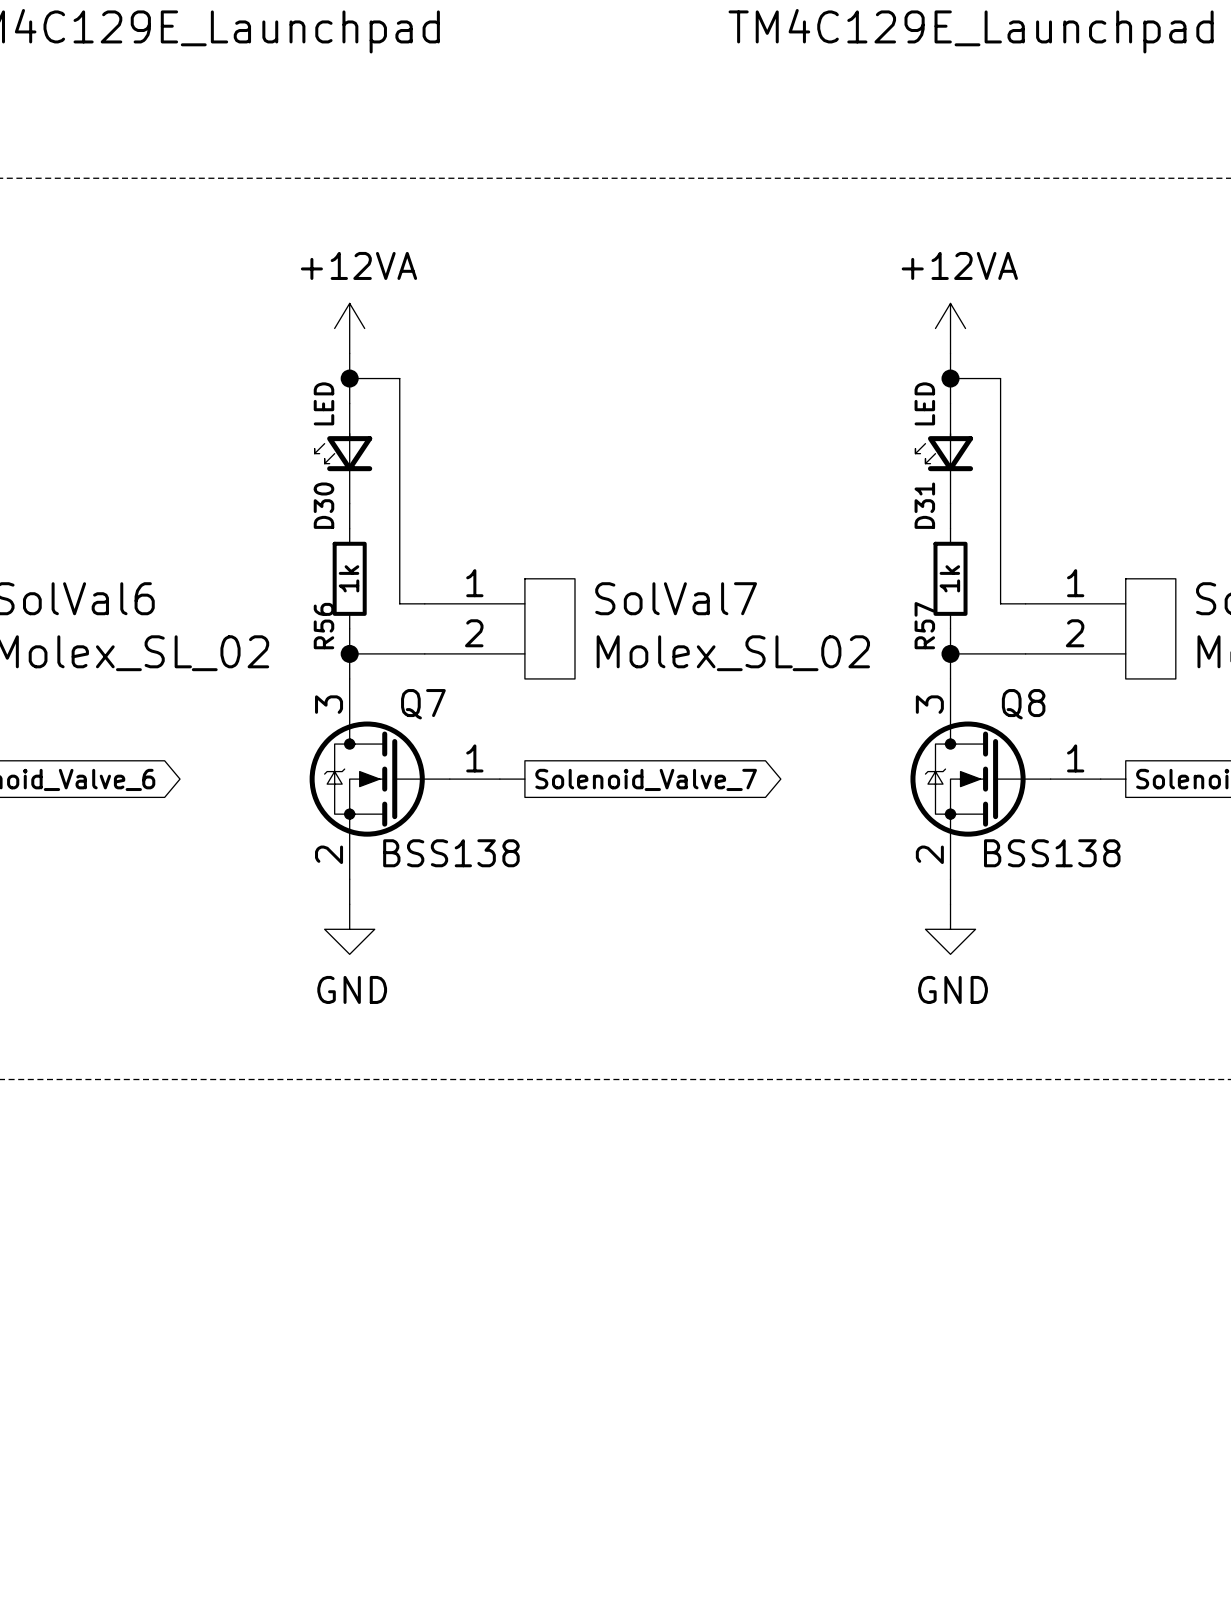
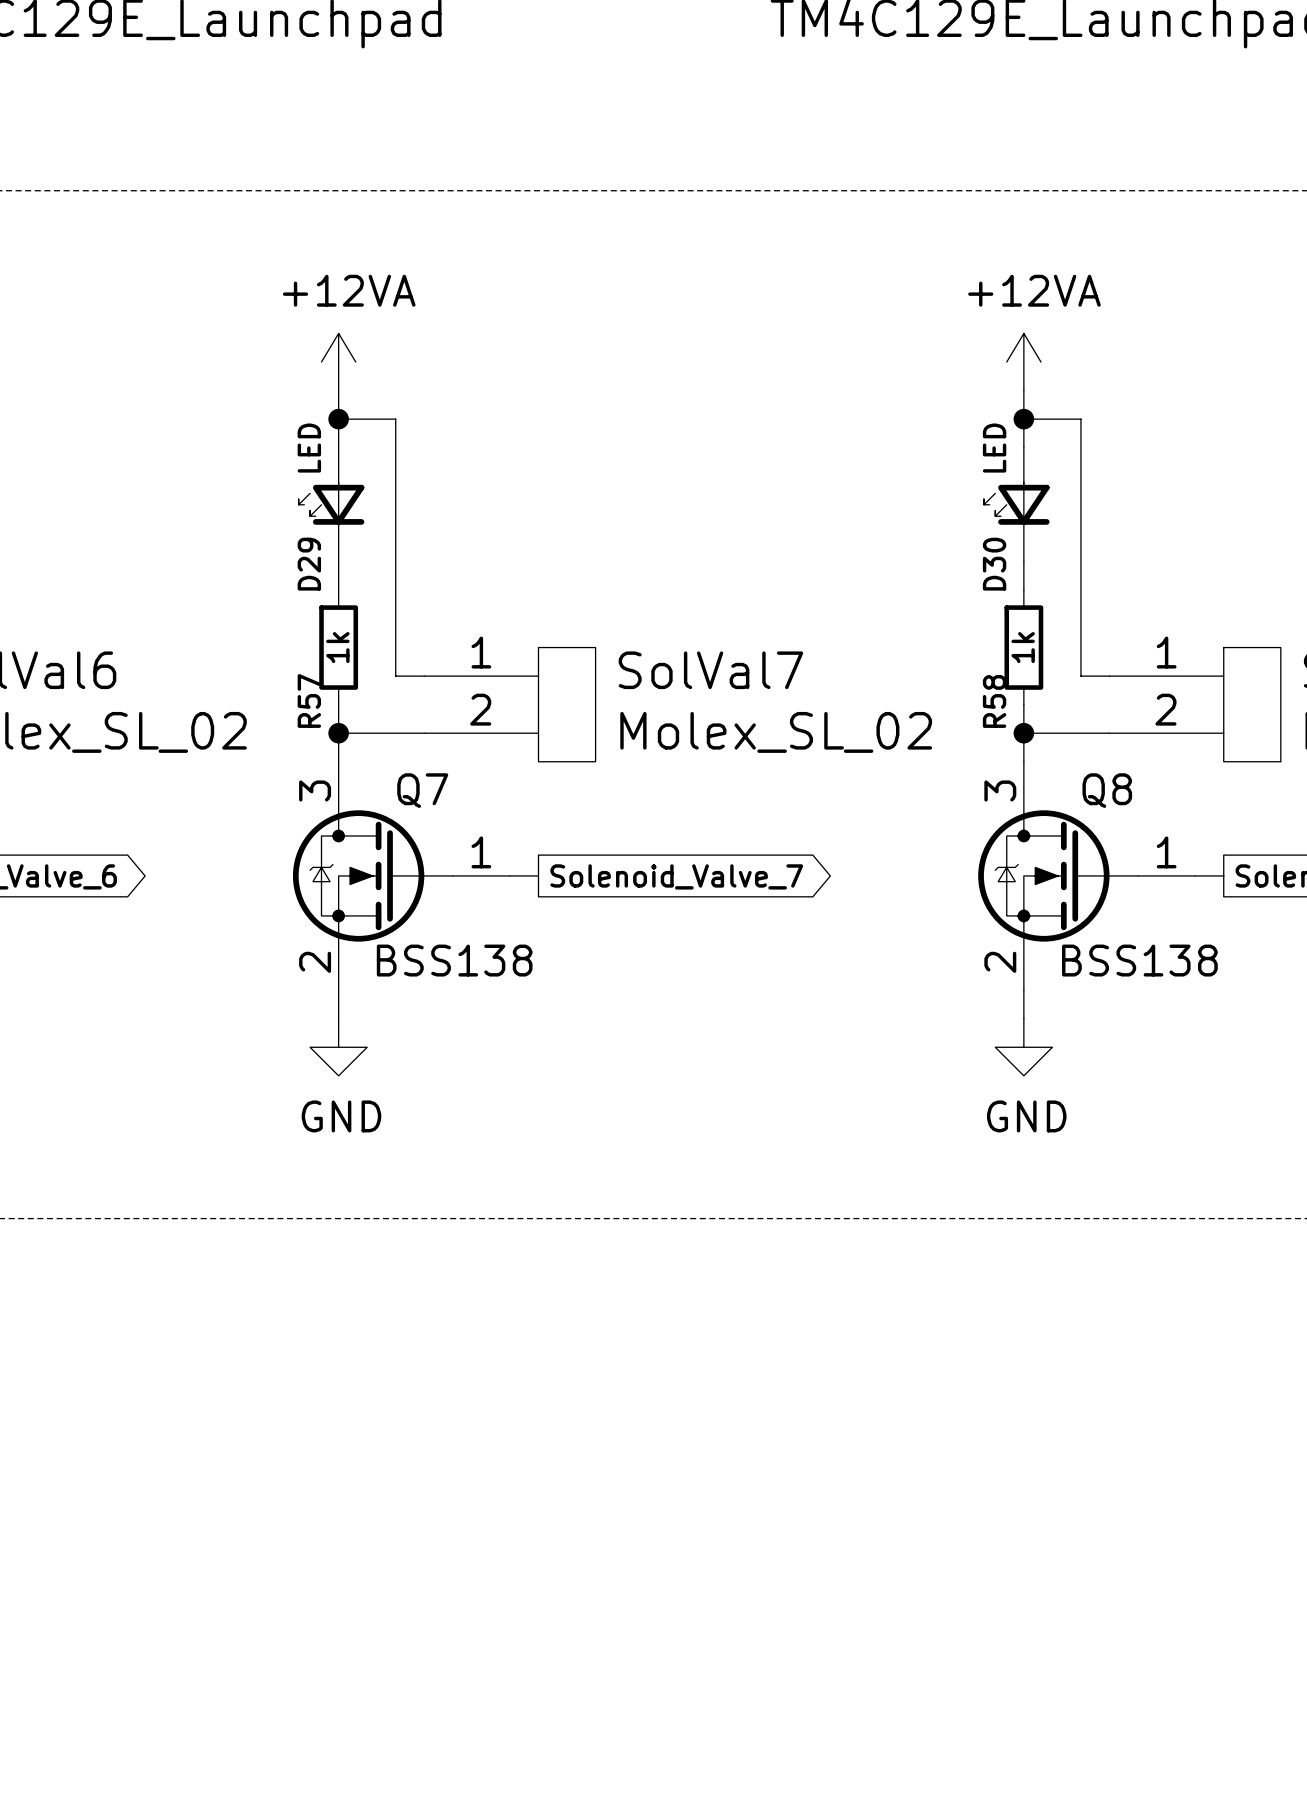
D30 name: D30 (323, 505) -> D29 (309, 564)
D31 name: D31 (924, 505) -> D30 (994, 564)
R57 name: R57 (924, 625) -> R58 (994, 701)
R56 name: R56 (323, 626) -> R57 (309, 700)

